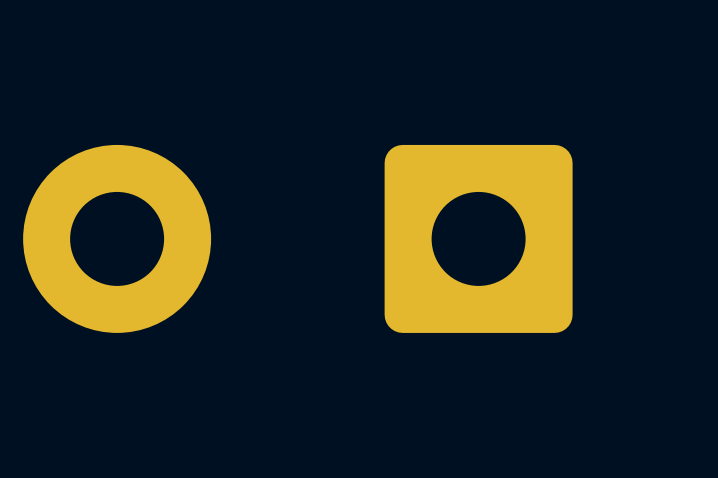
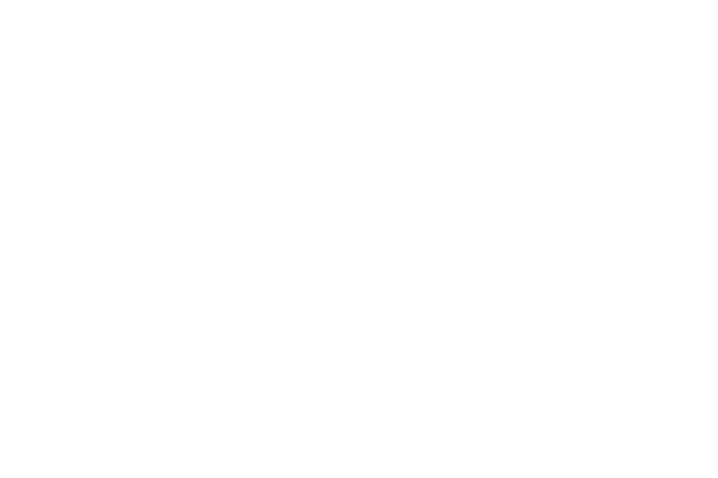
part: (297, 238) -> none

